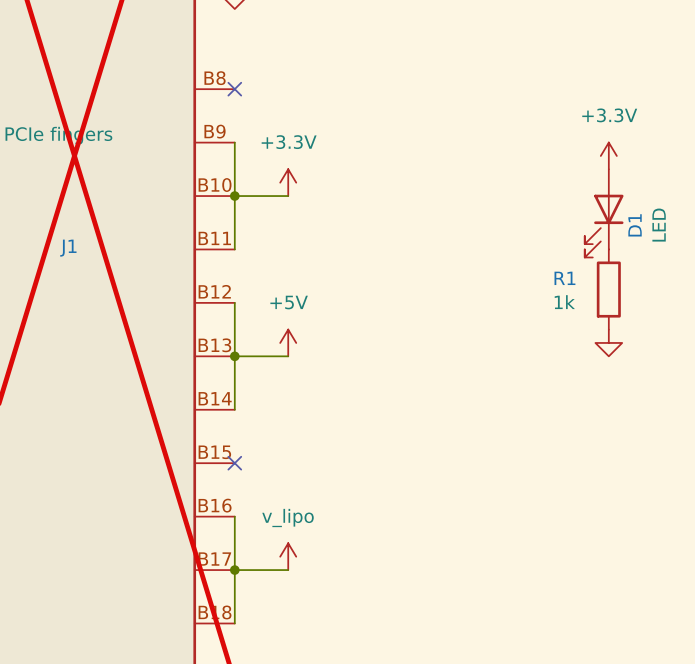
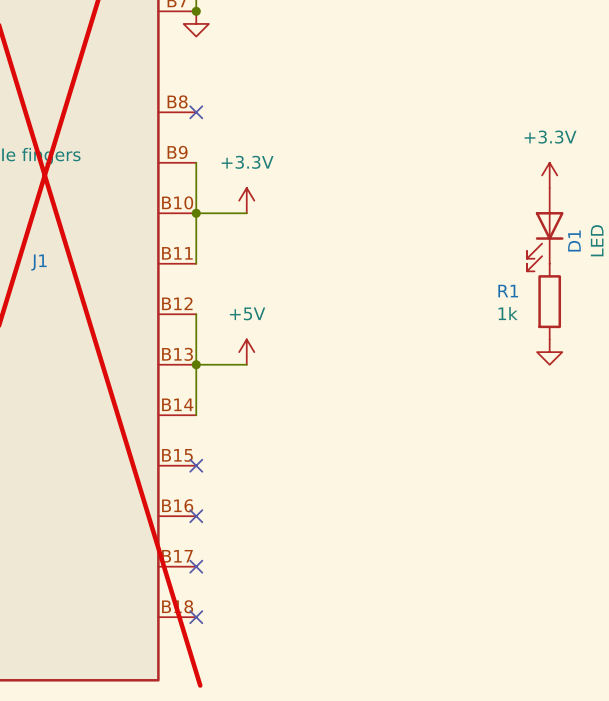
wire: (234, 516) (234, 623) -> none
no-connect mark: none -> (196, 516)
power symbol: v_lipo (288, 556) -> none
wire: (234, 570) (288, 570) -> none
junction: (234, 570) -> none
no-connect mark: none -> (196, 566)
no-connect mark: none -> (196, 617)

